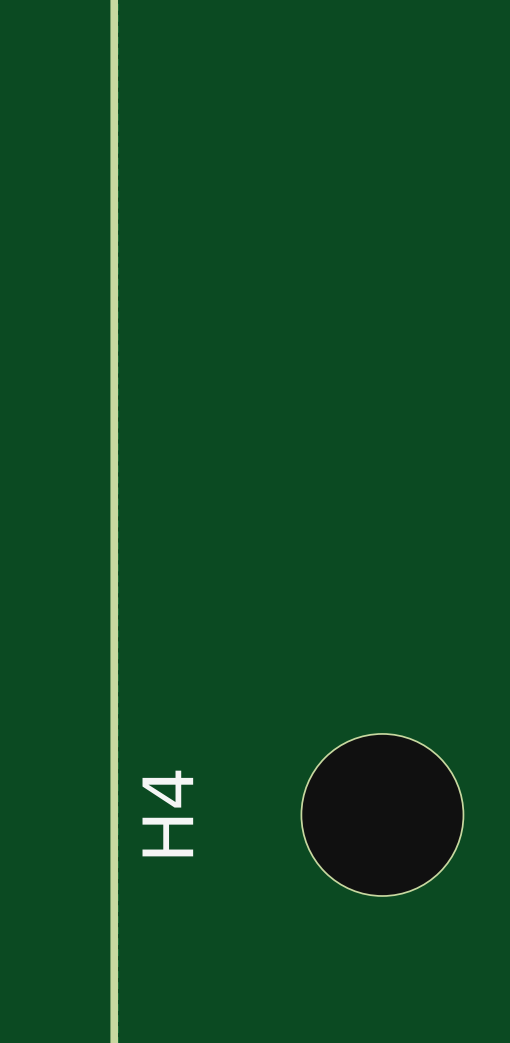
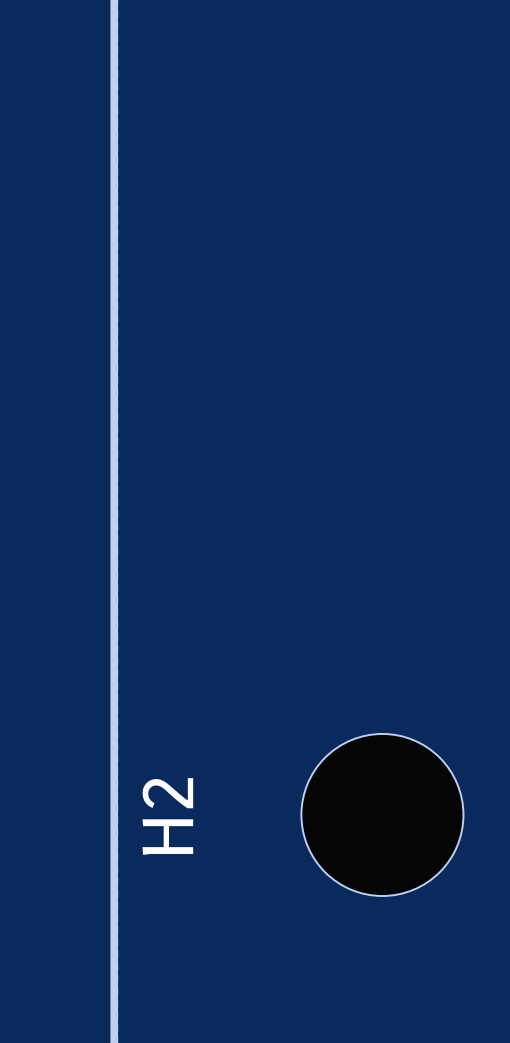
H4 name: H4 (167, 813) -> H2 (167, 816)

